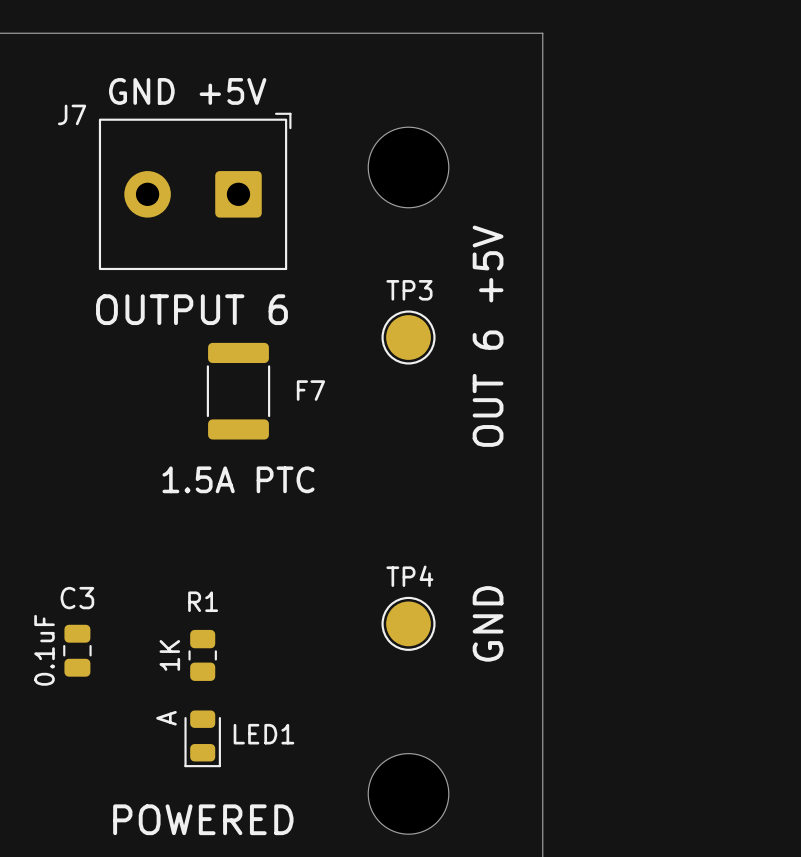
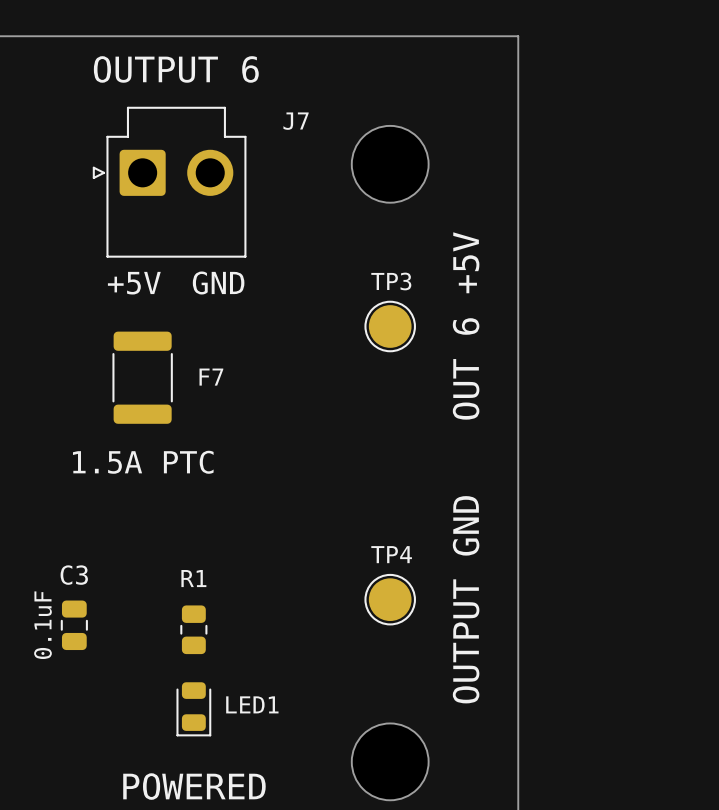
text position: GND (141, 91) -> GND (218, 283)
text position: +5V (233, 91) -> +5V (134, 283)
J7 footprint: [98, 112, 292, 271] -> [92, 106, 247, 258]
J7 name position: J7 (72, 114) -> J7 (296, 121)
text position: OUTPUT 6 (191, 309) -> OUTPUT 6 (176, 69)
F7 position: (238, 391) -> (142, 377)
text position: 1.5A PTC (238, 479) -> 1.5A PTC (143, 462)
text: GND (488, 623) -> OUTPUT GND (466, 599)
R1 value: 1K (169, 655) -> none
text: A (166, 718) -> none

